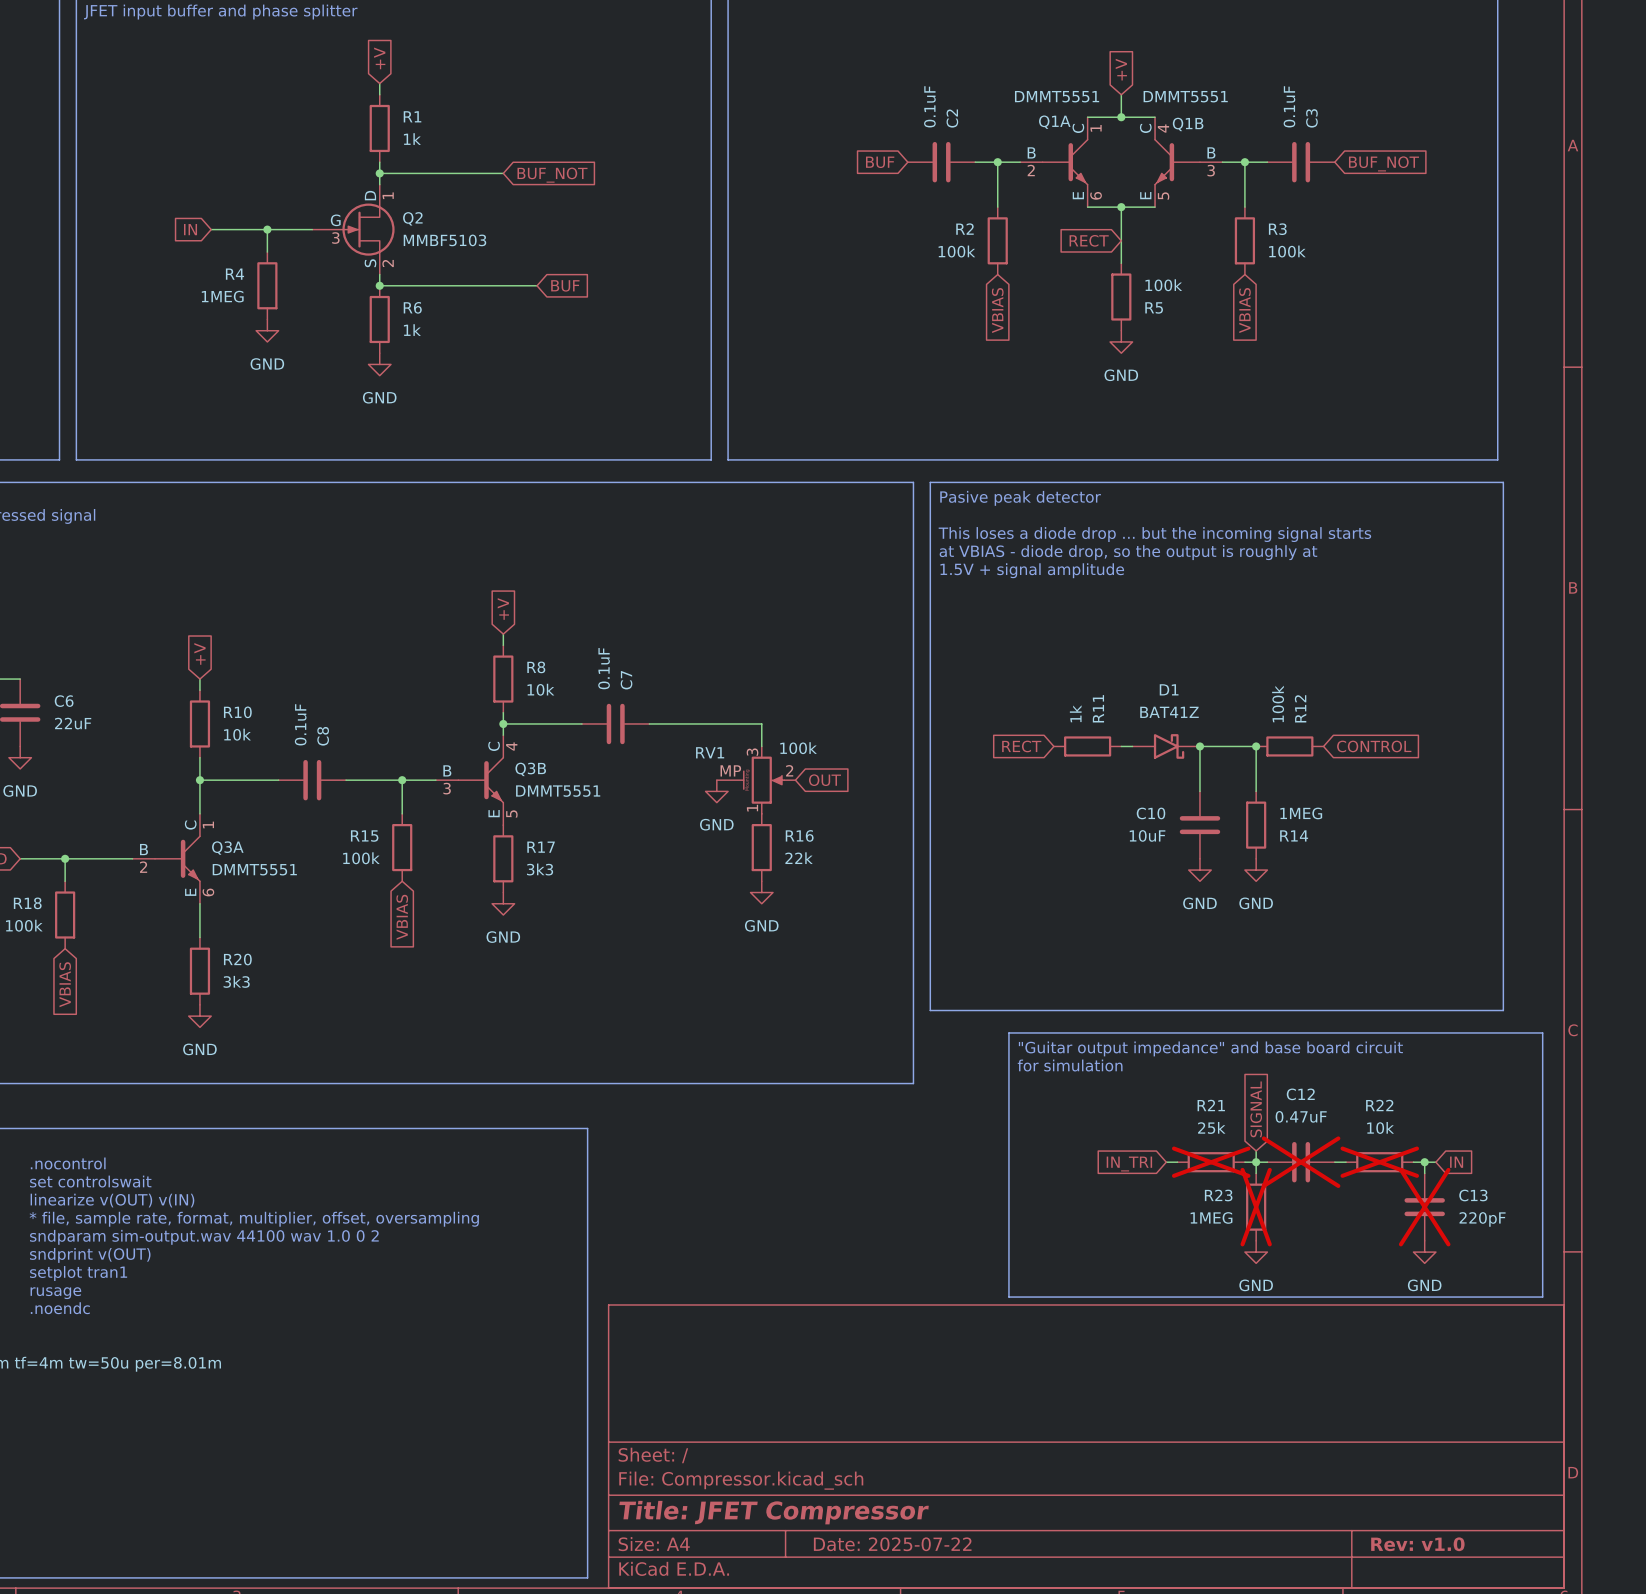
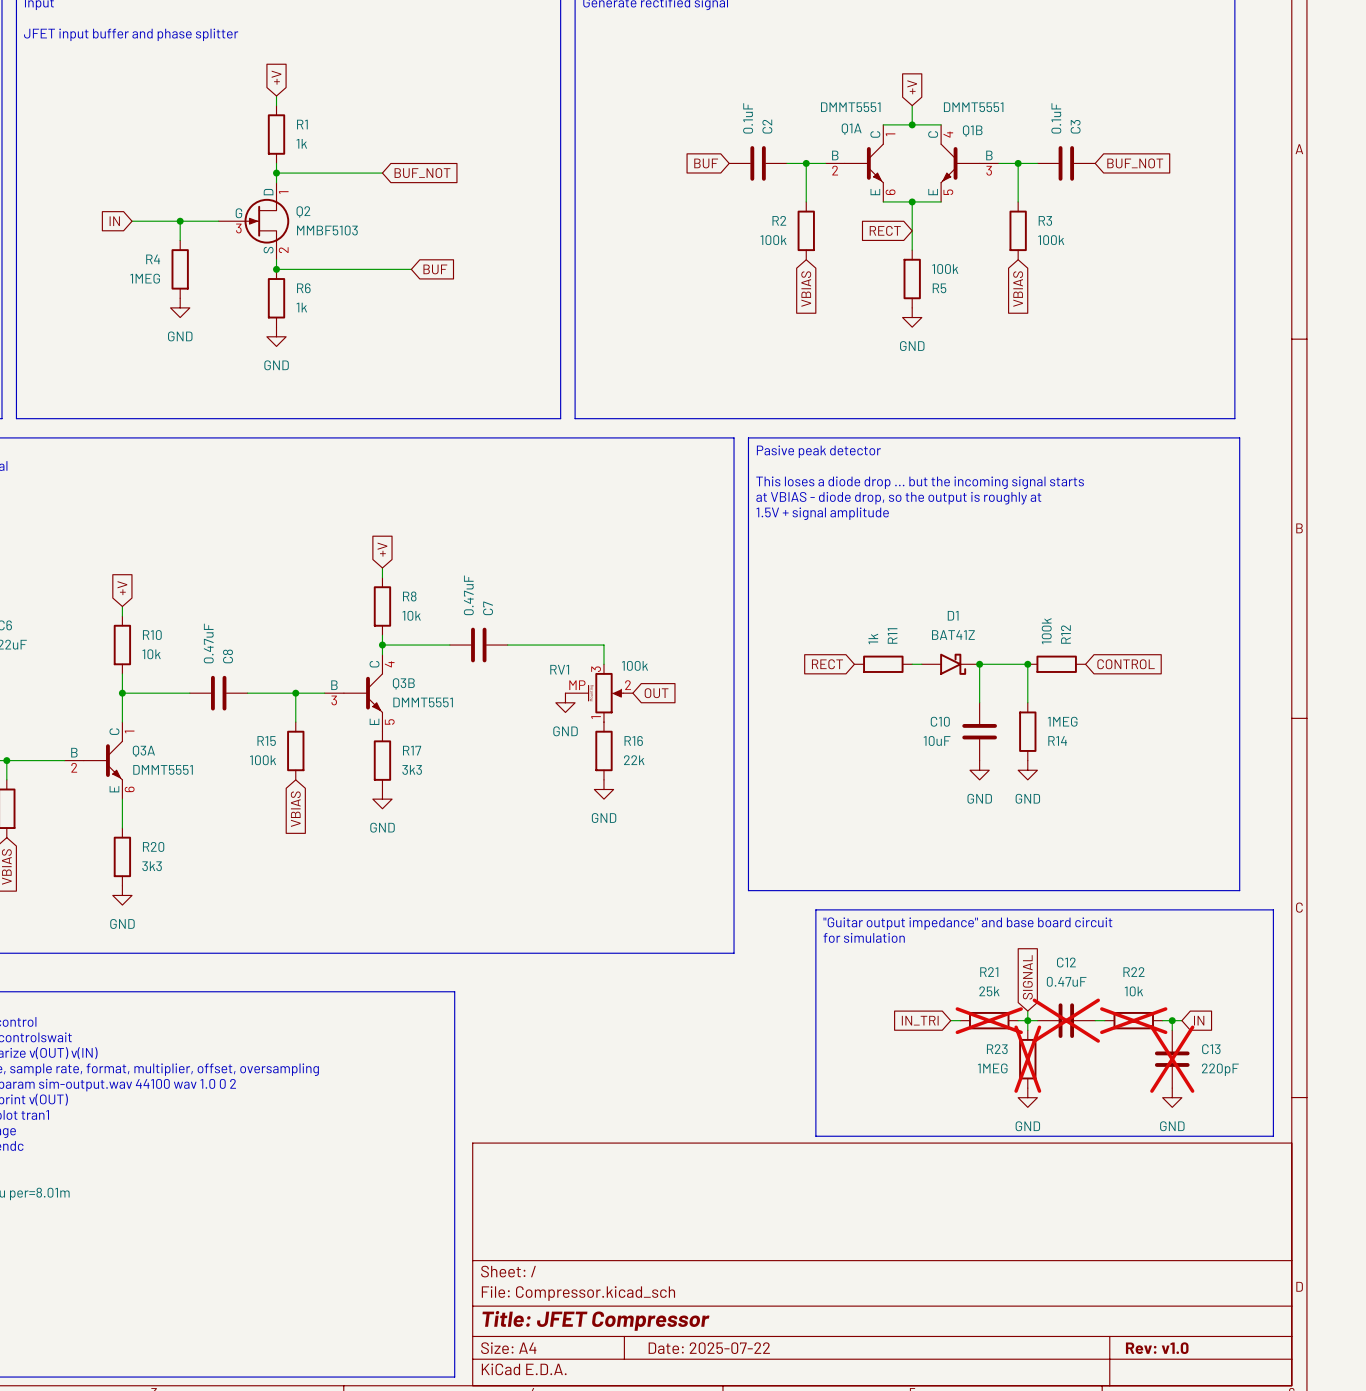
C7 value: 0.1uF (604, 668) -> 0.47uF (468, 595)
C8 value: 0.1uF (300, 724) -> 0.47uF (208, 643)

